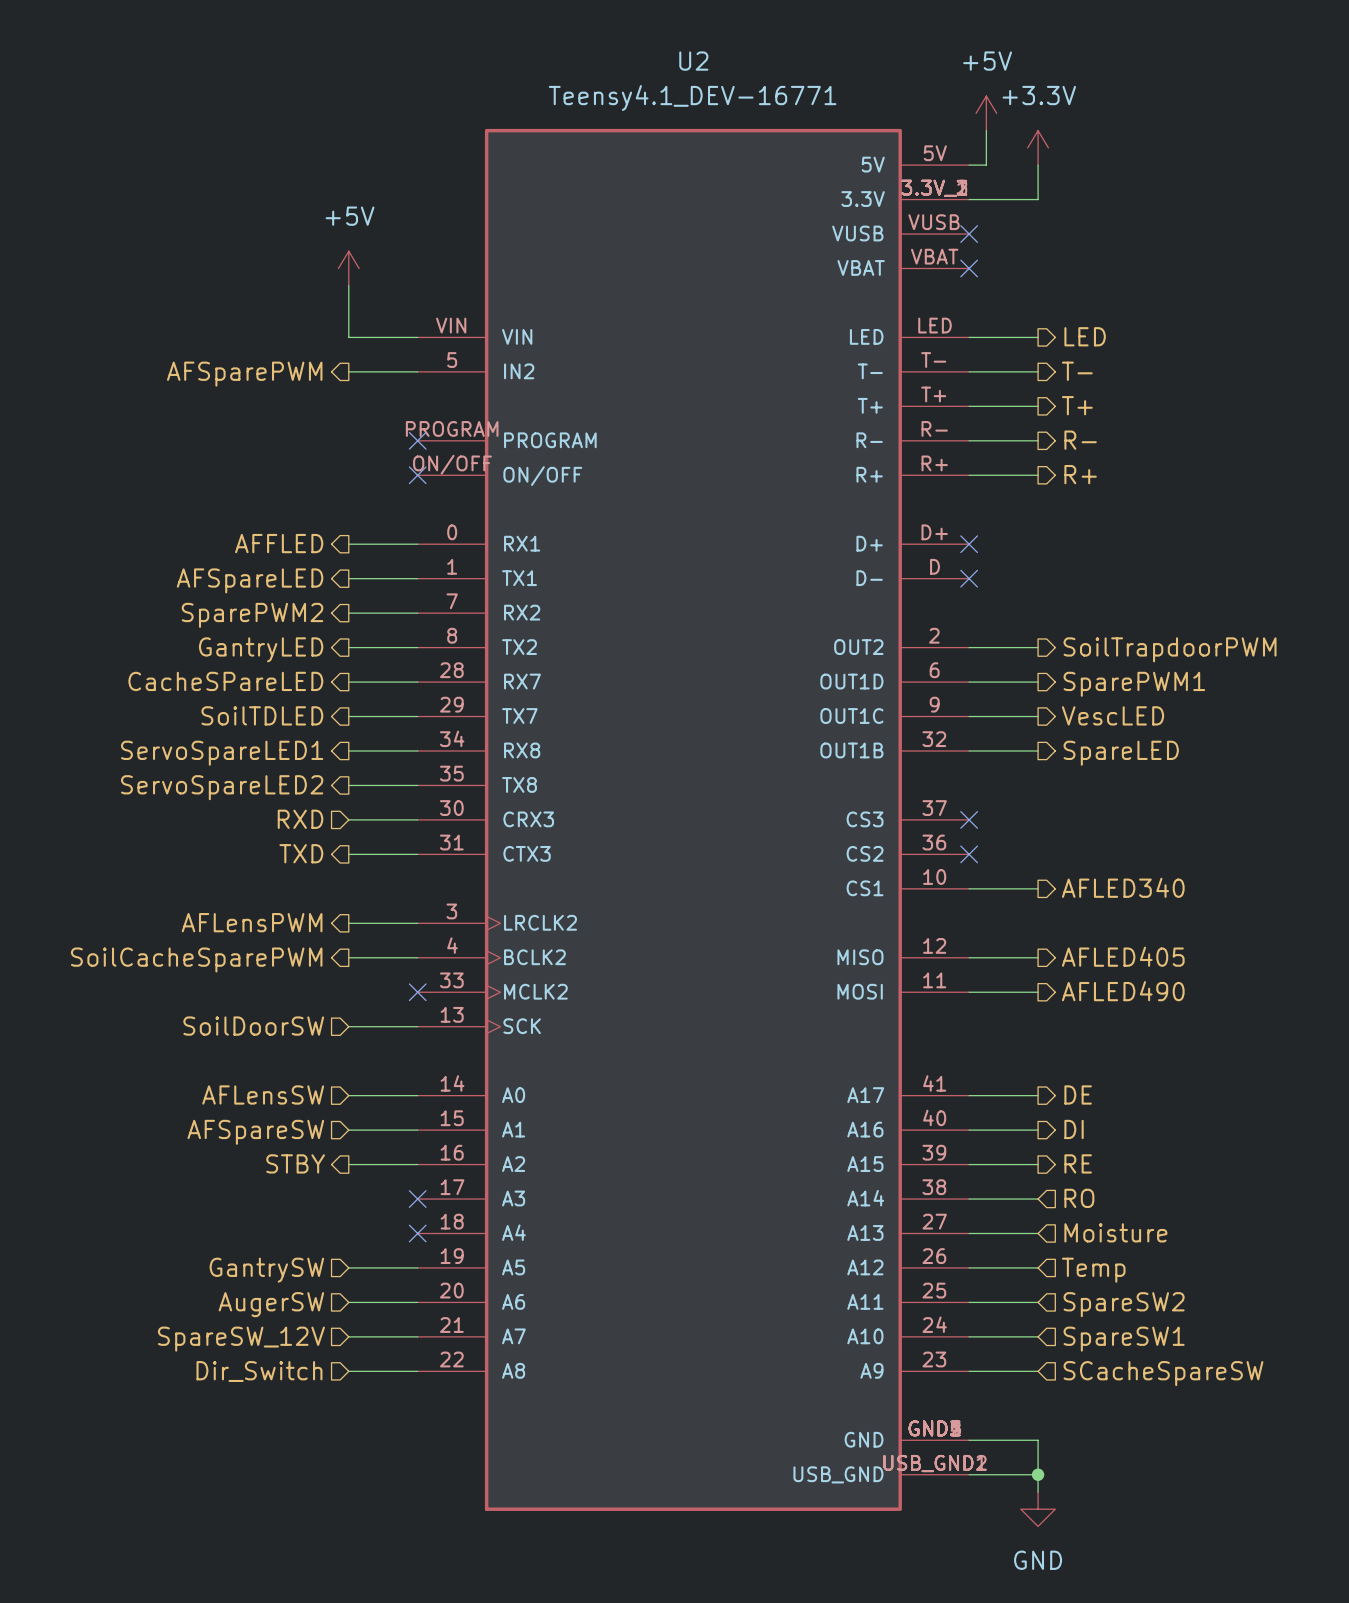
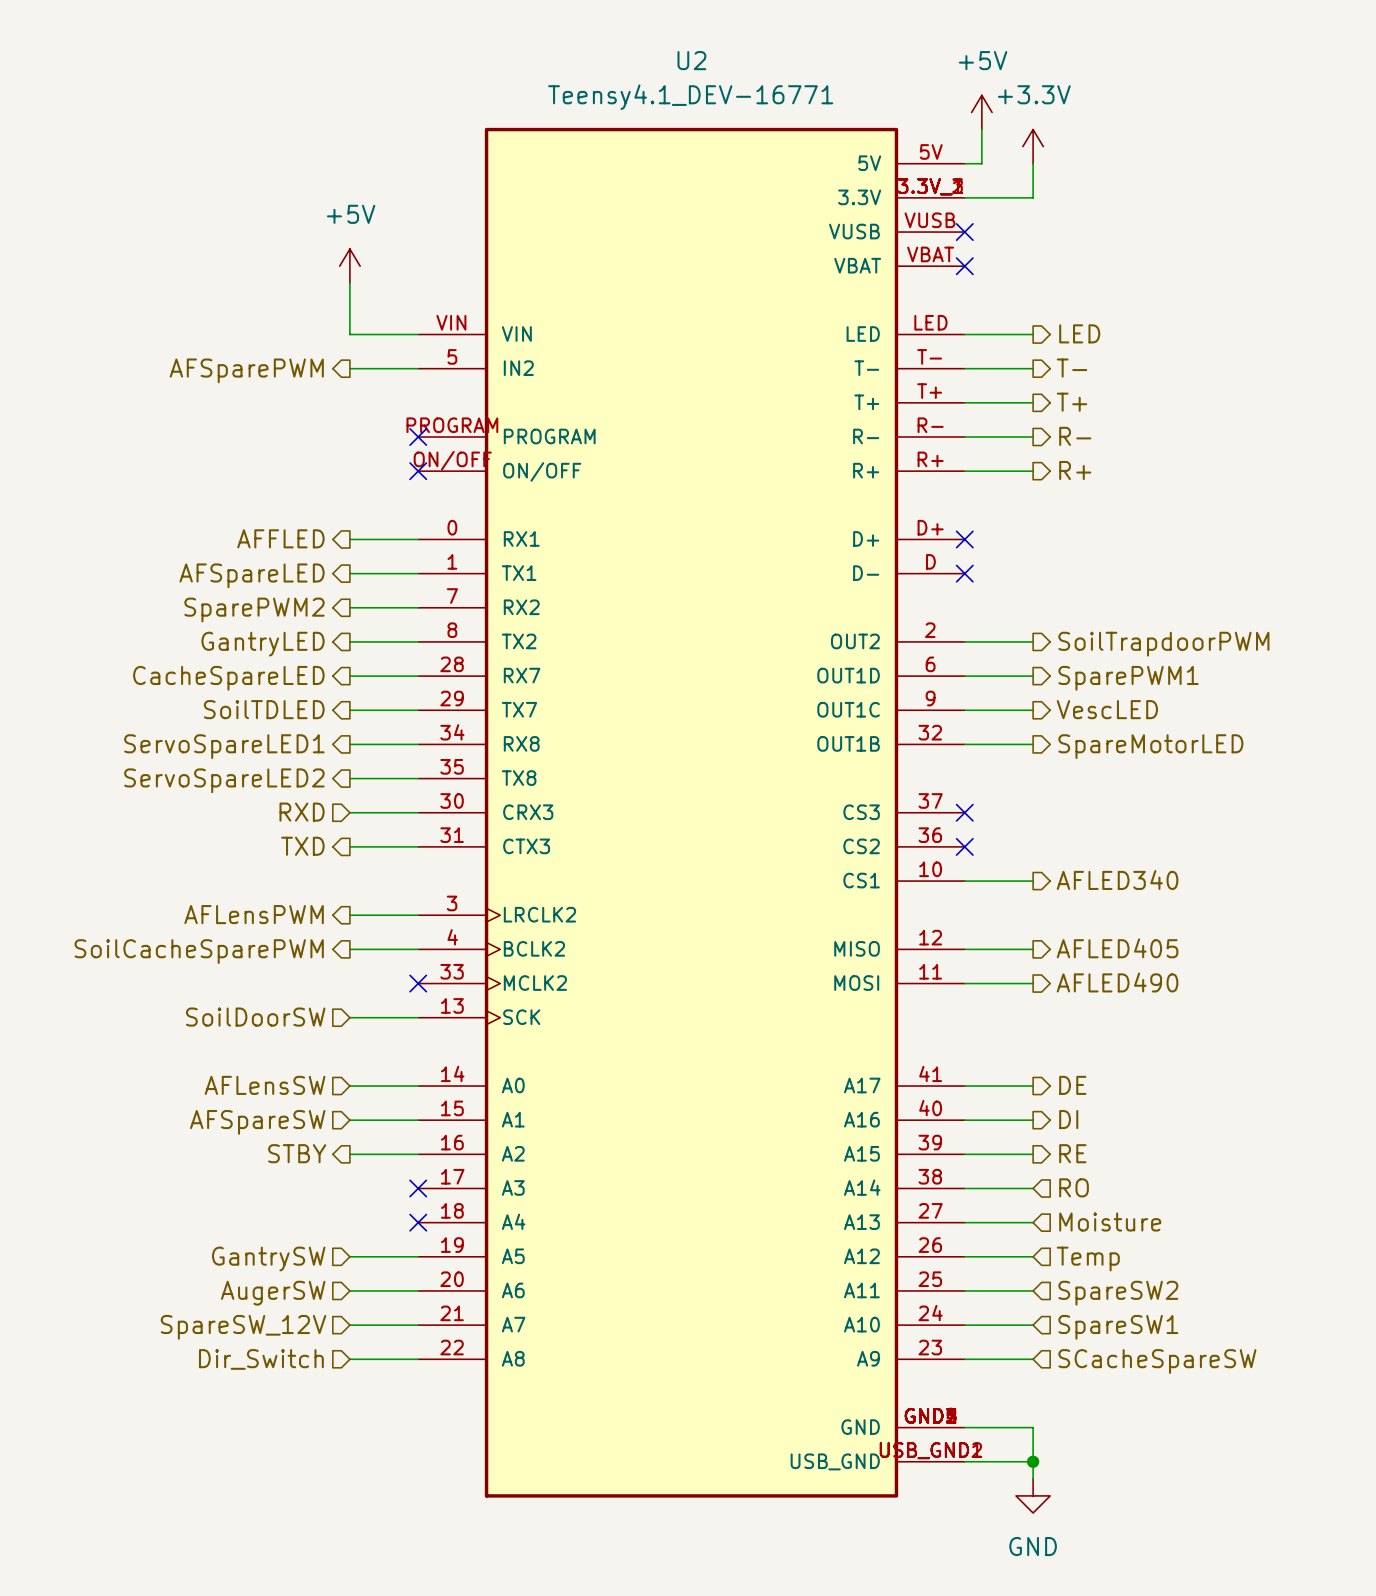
hierarchical label: CacheSPareLED (225, 681) -> CacheSpareLED (228, 678)
hierarchical label: SpareLED (1121, 753) -> SpareMotorLED (1150, 746)

